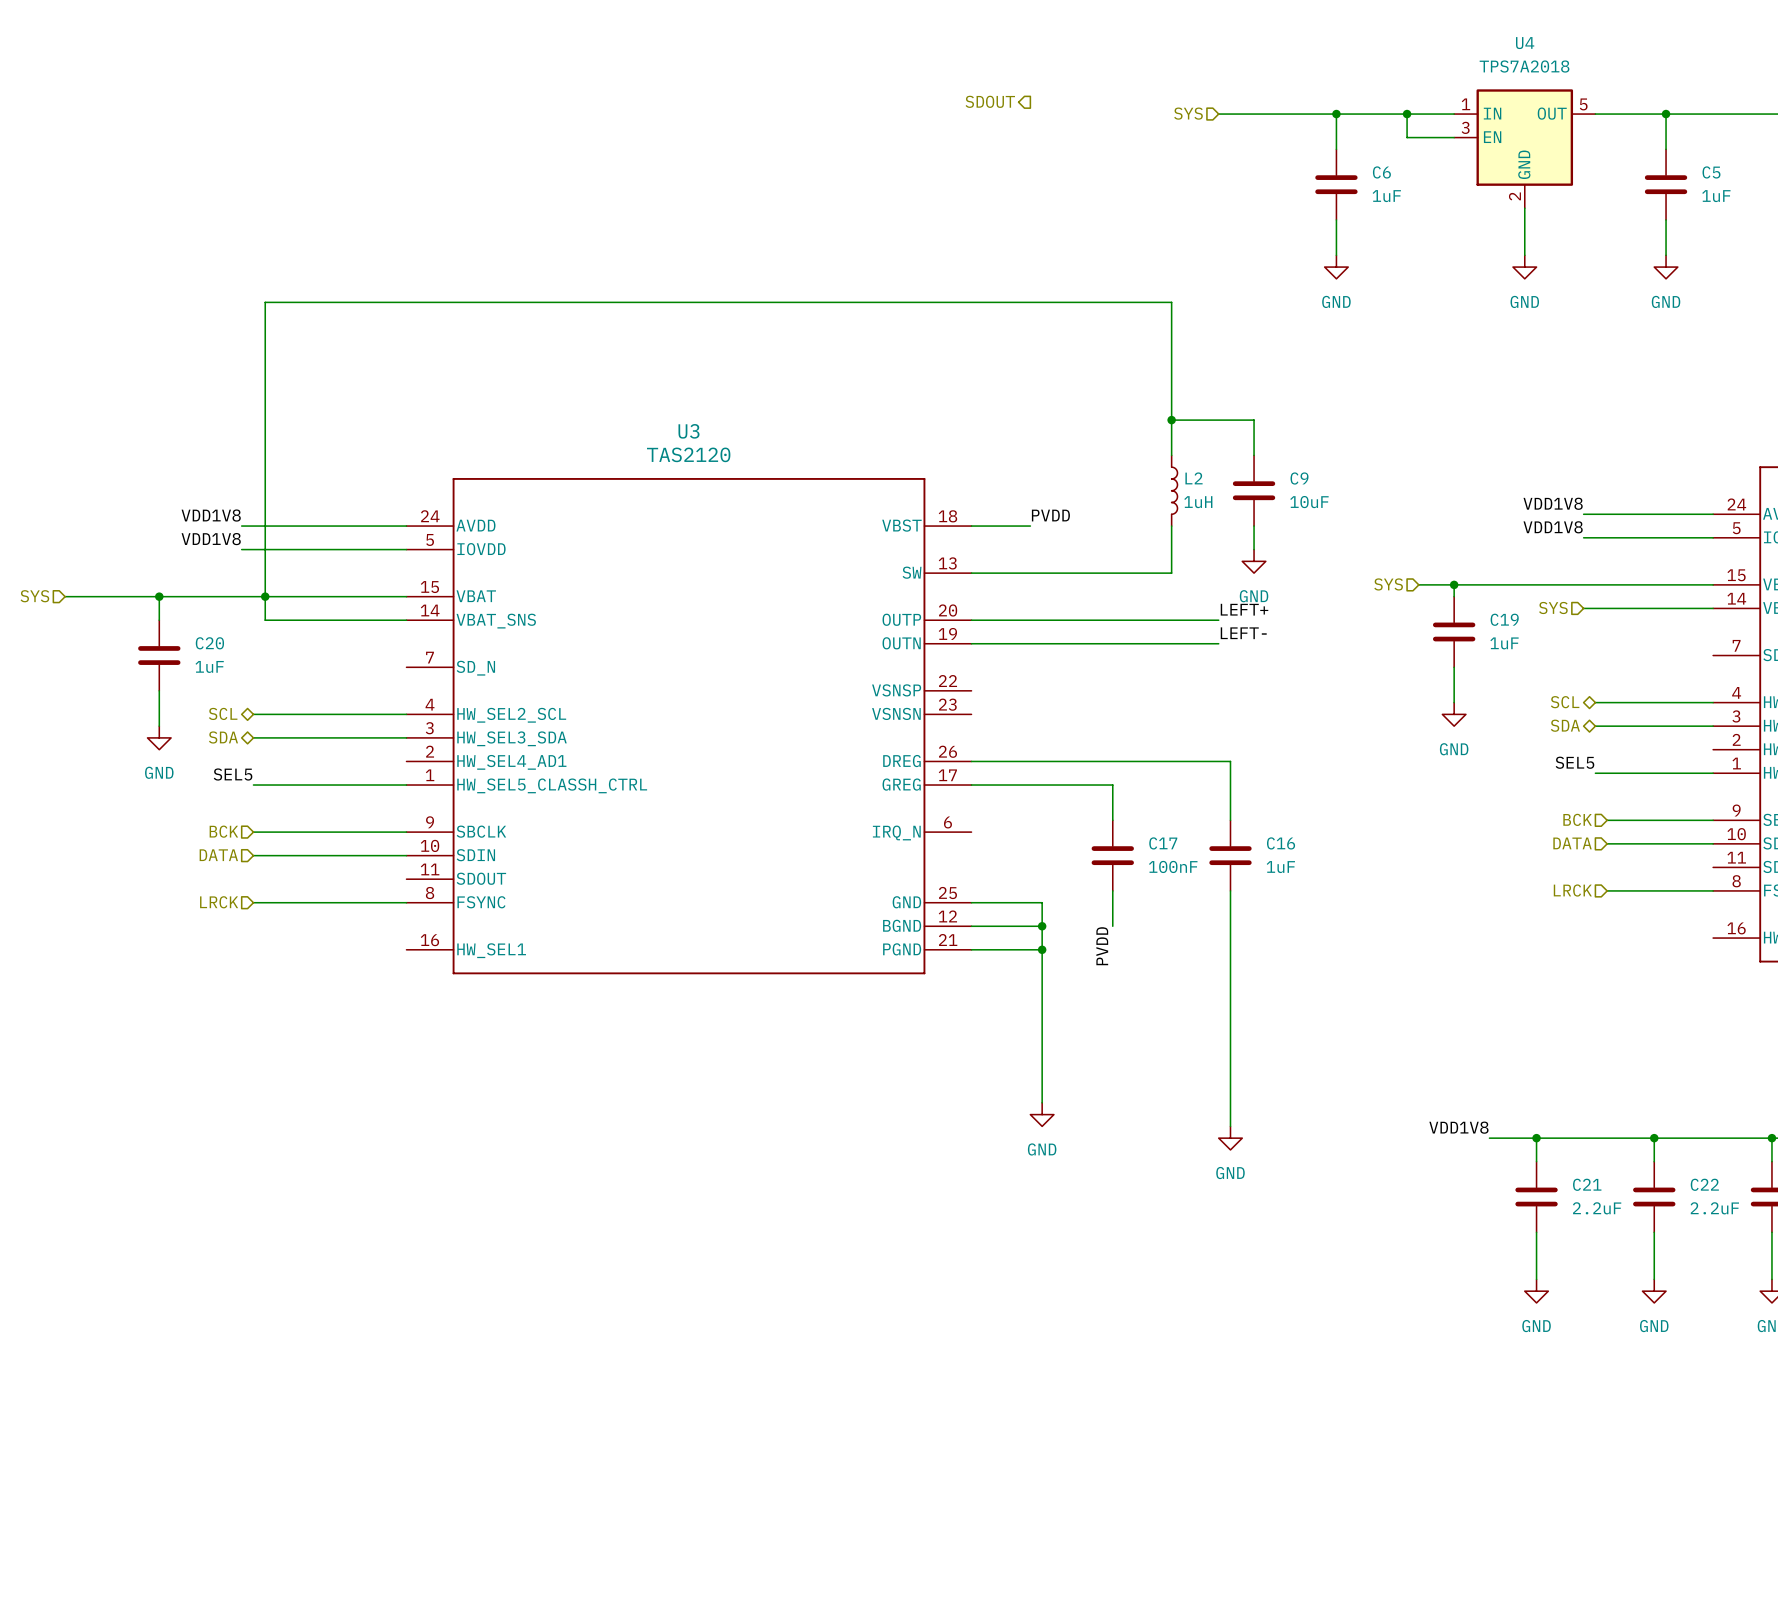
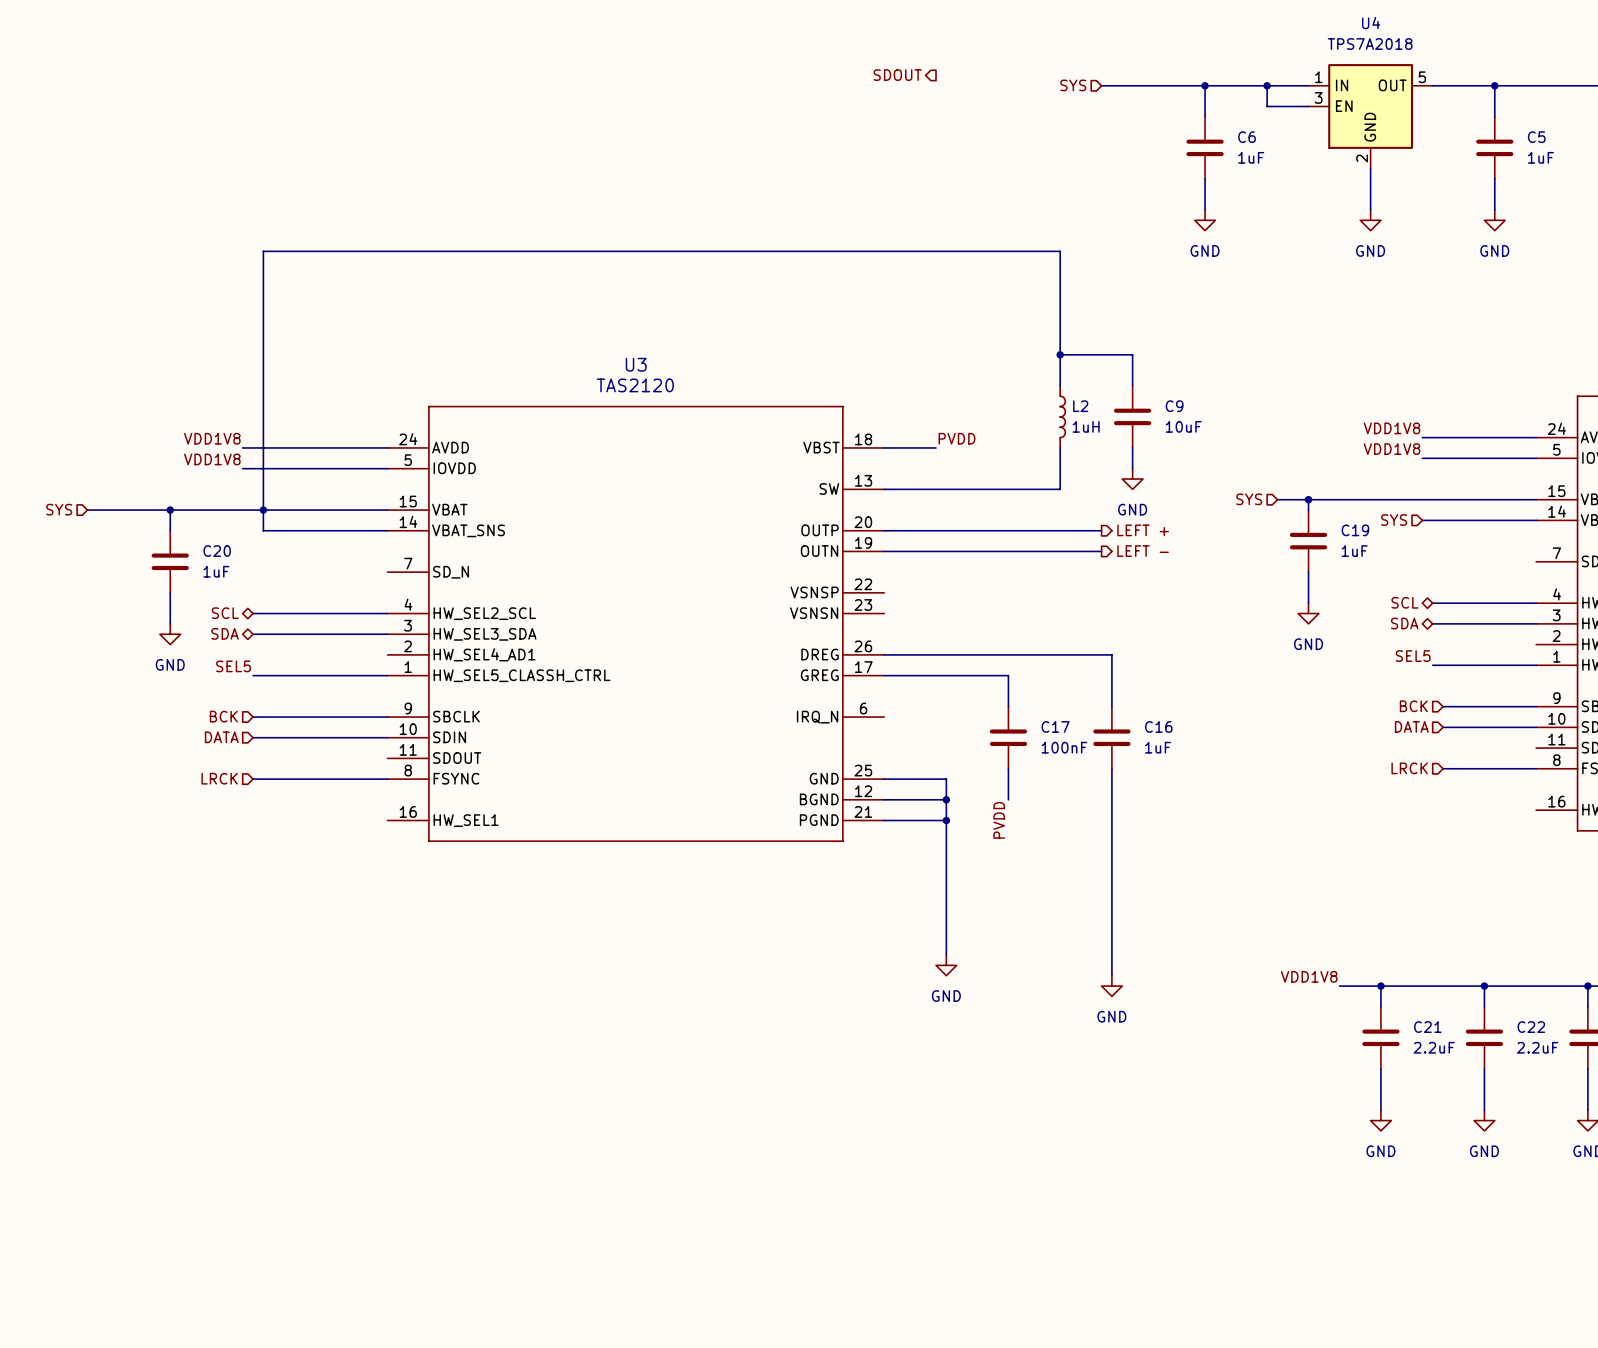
label: LEFT+ (1244, 609) -> none
hierarchical label: none -> LEFT + (1143, 530)
label: LEFT- (1243, 633) -> none
hierarchical label: none -> LEFT - (1143, 551)

